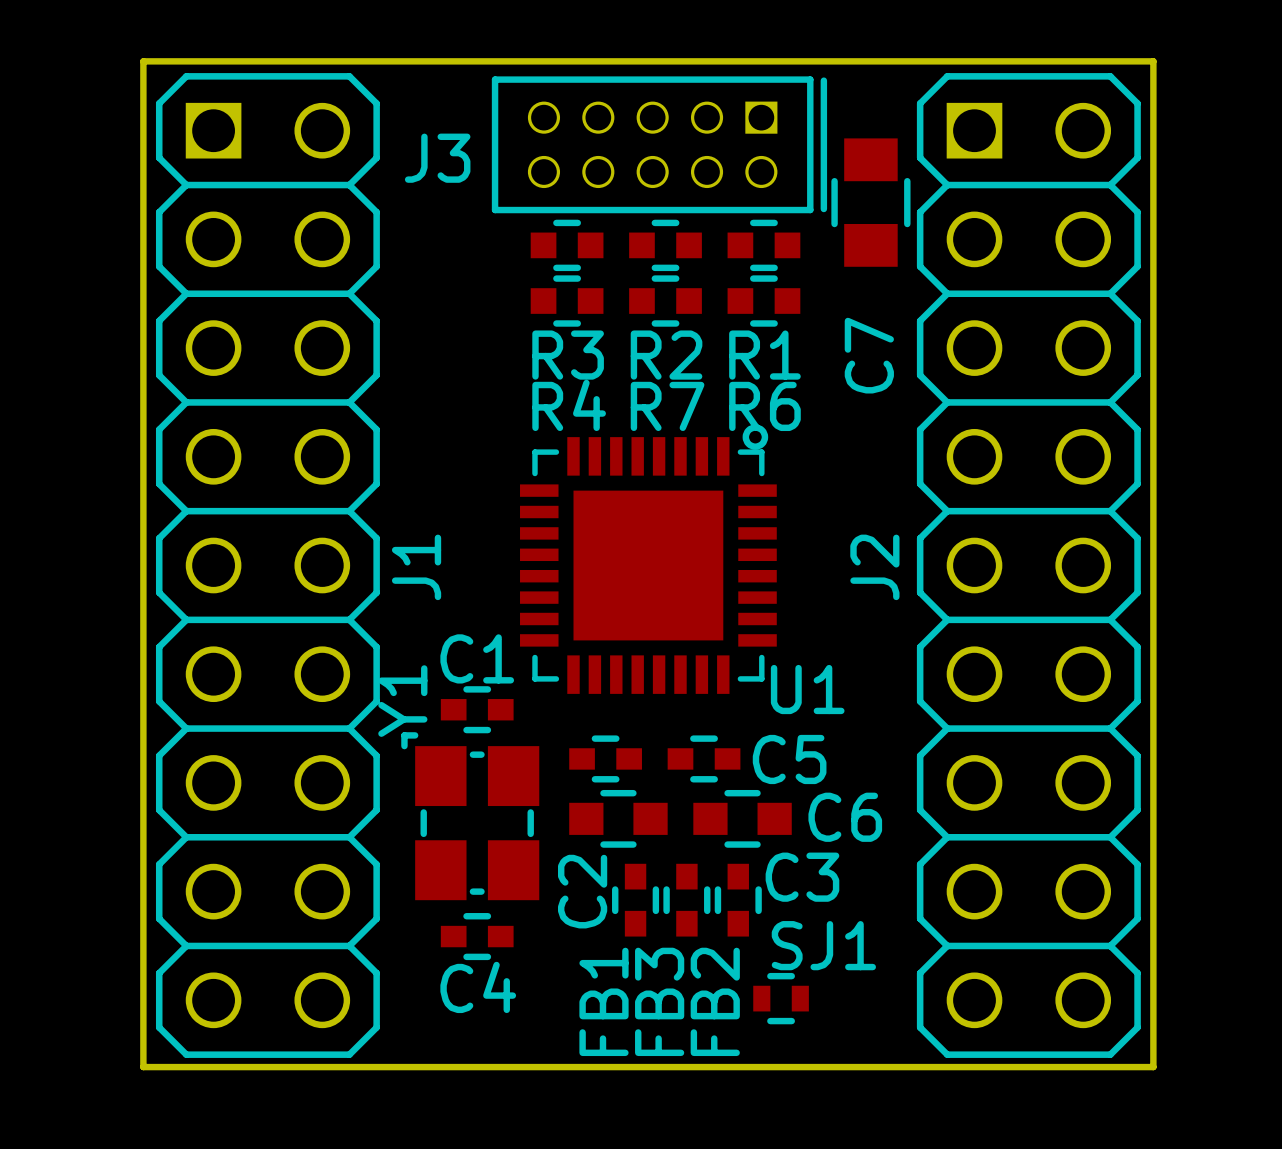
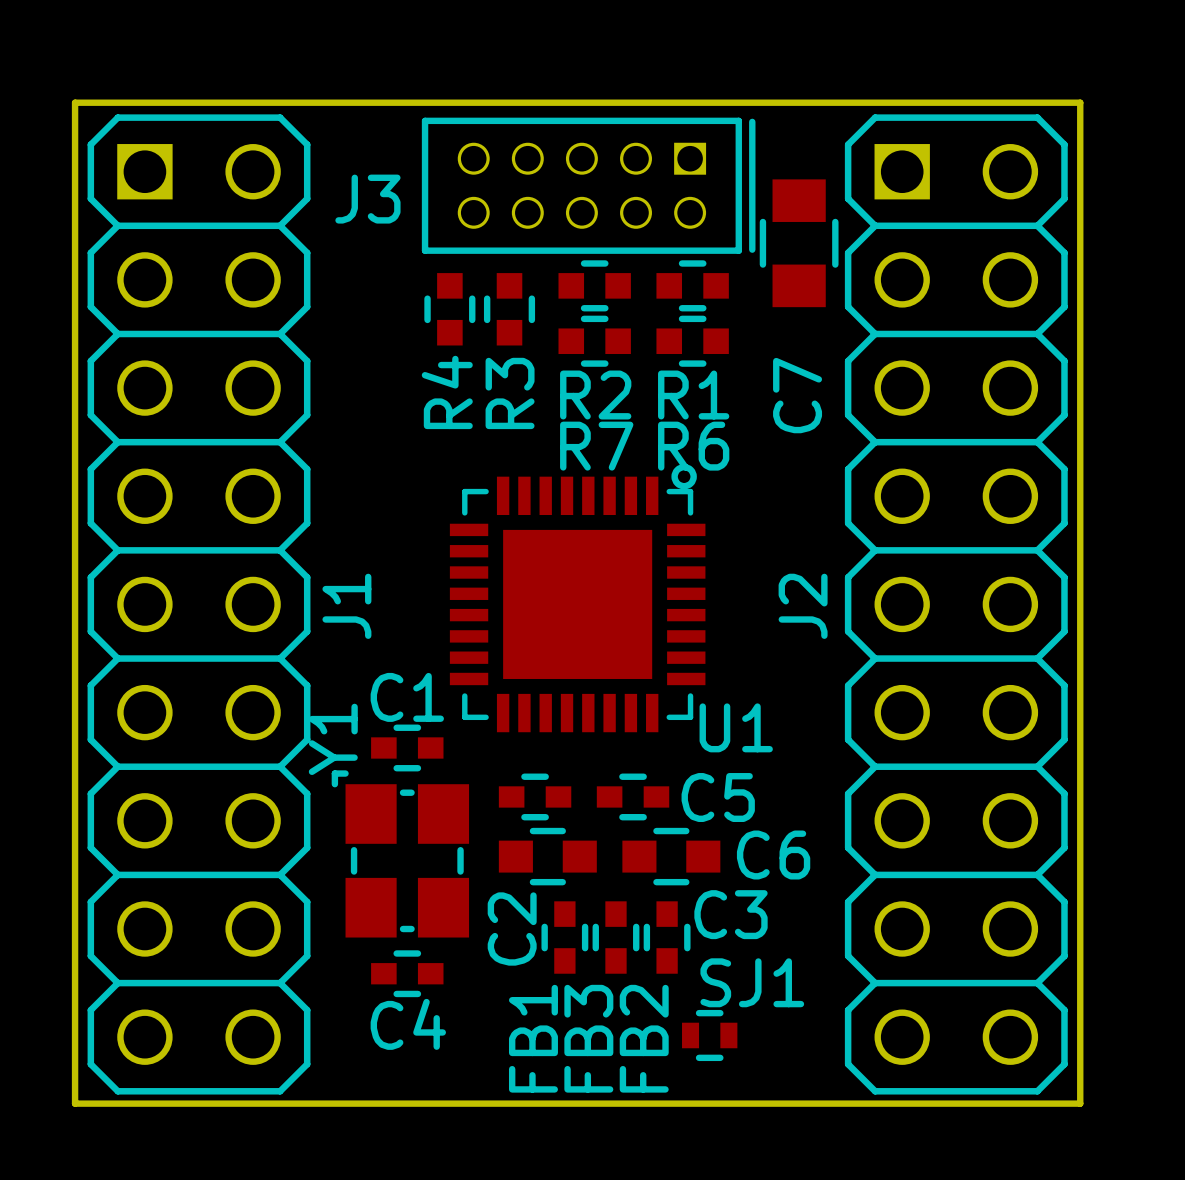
R3 rotation: 0° (567, 245) -> 90° clockwise (509, 309)
R4 rotation: 0° (567, 301) -> 90° clockwise (449, 309)
R4 position: (567, 301) -> (449, 309)

